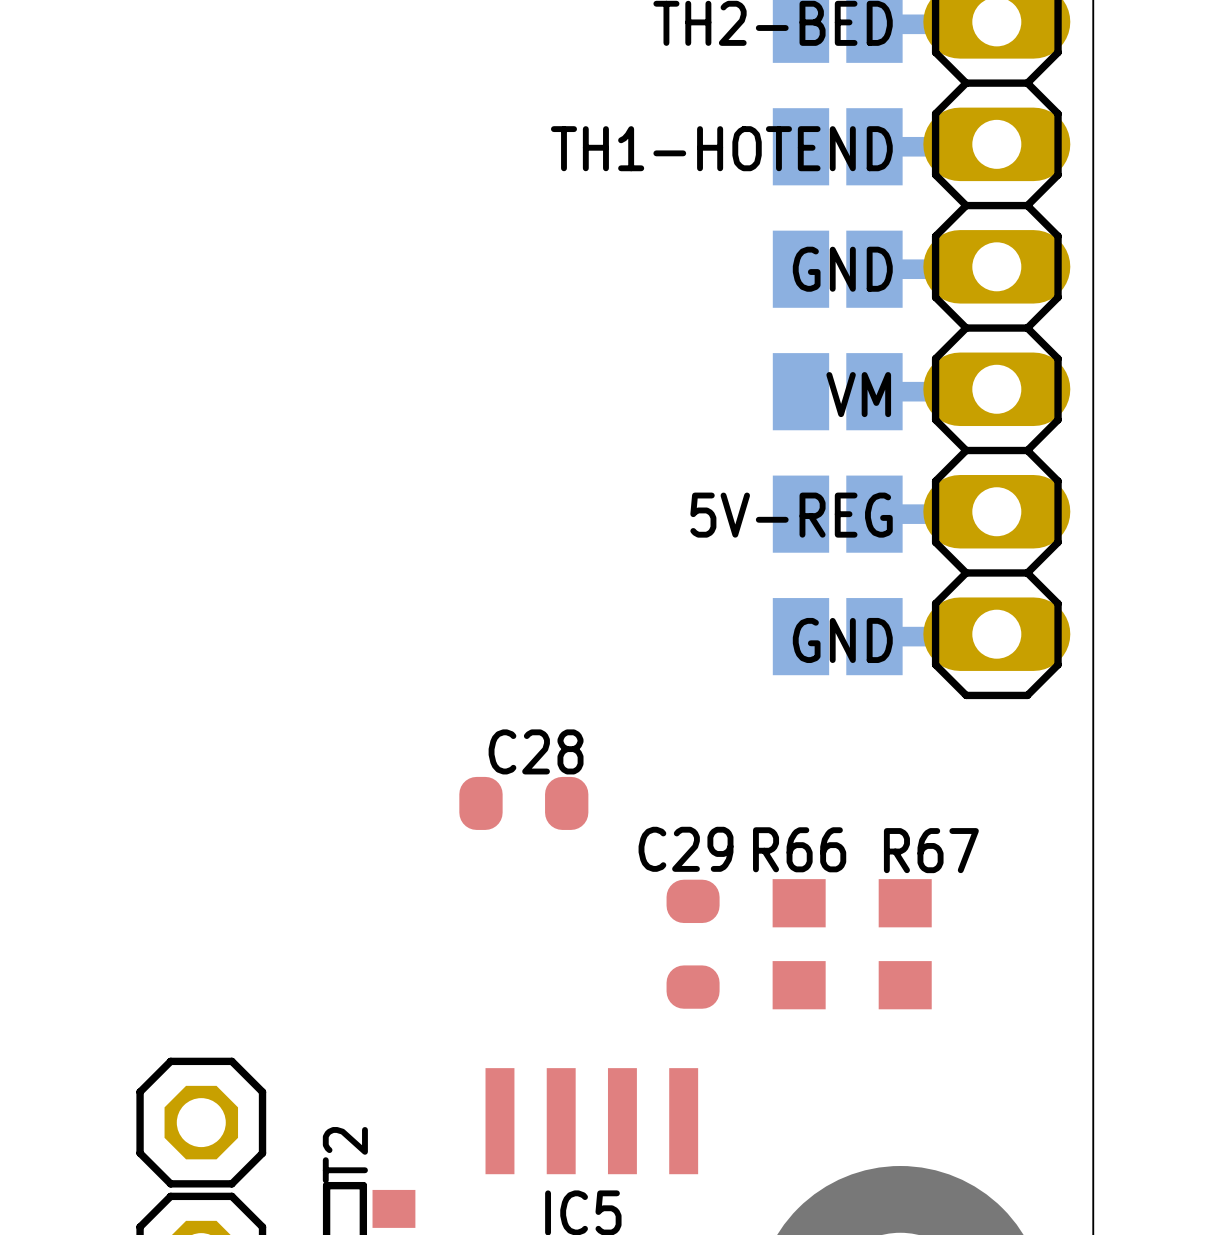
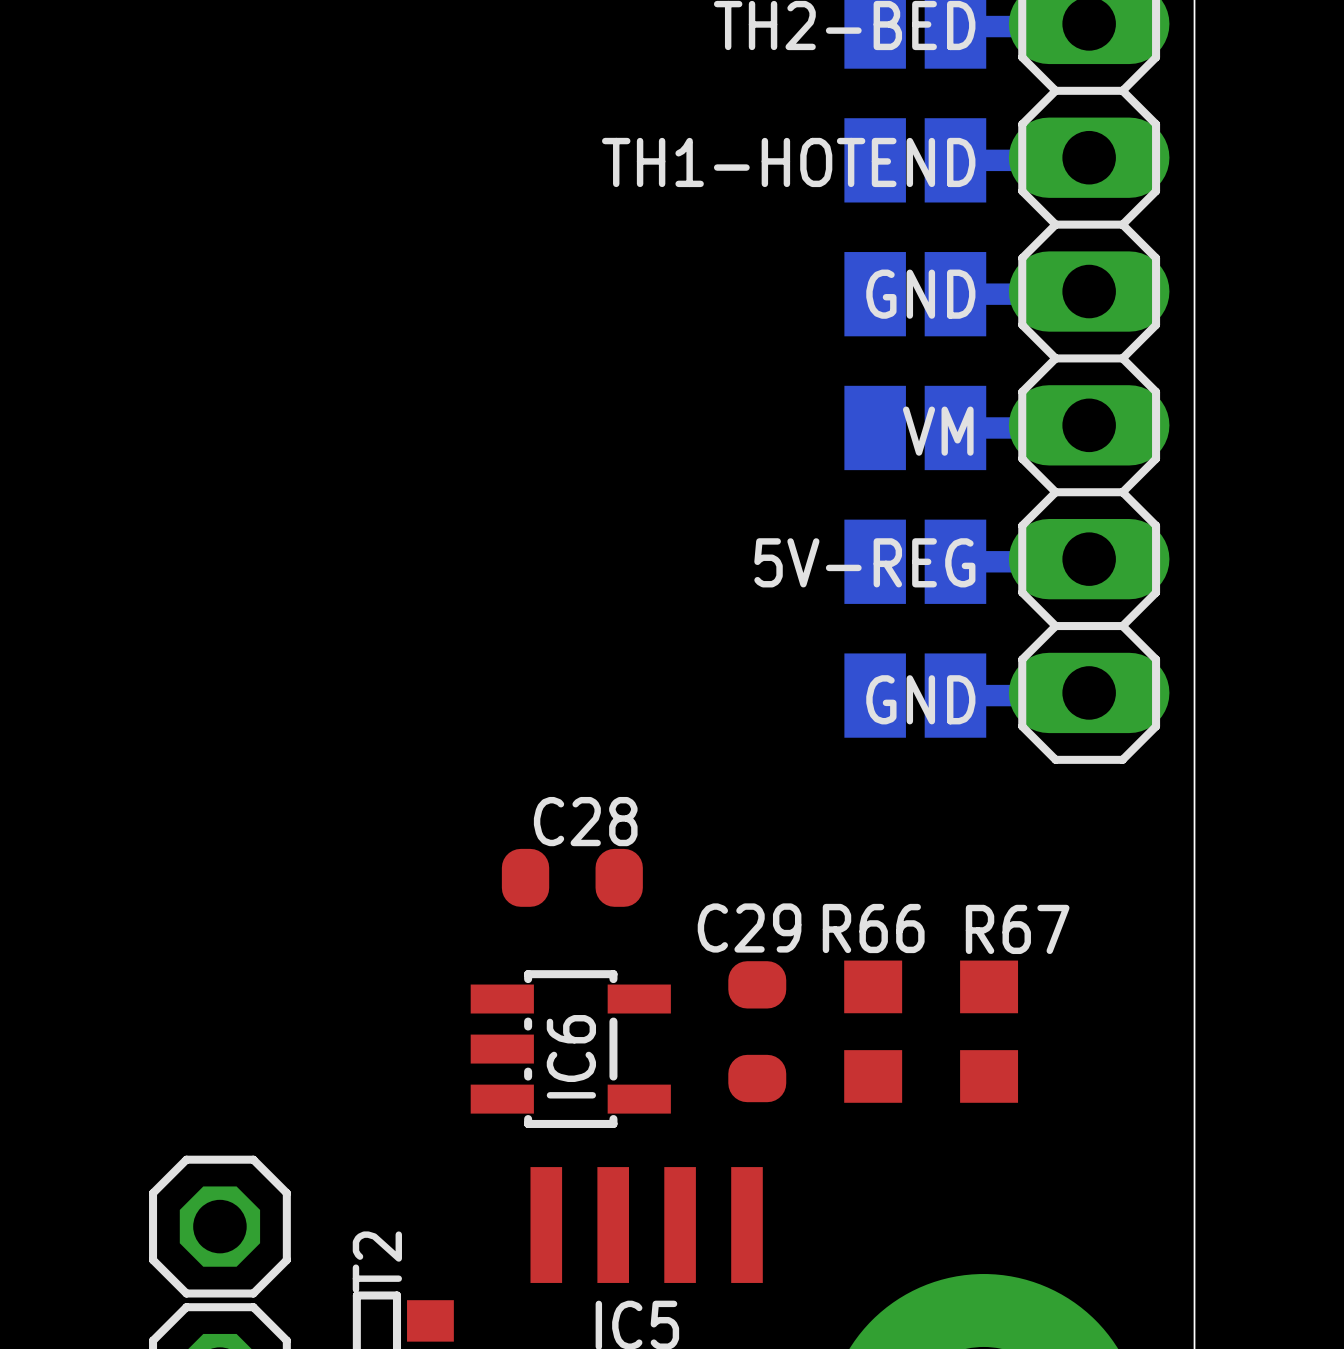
IC6: none -> (570, 1049)

